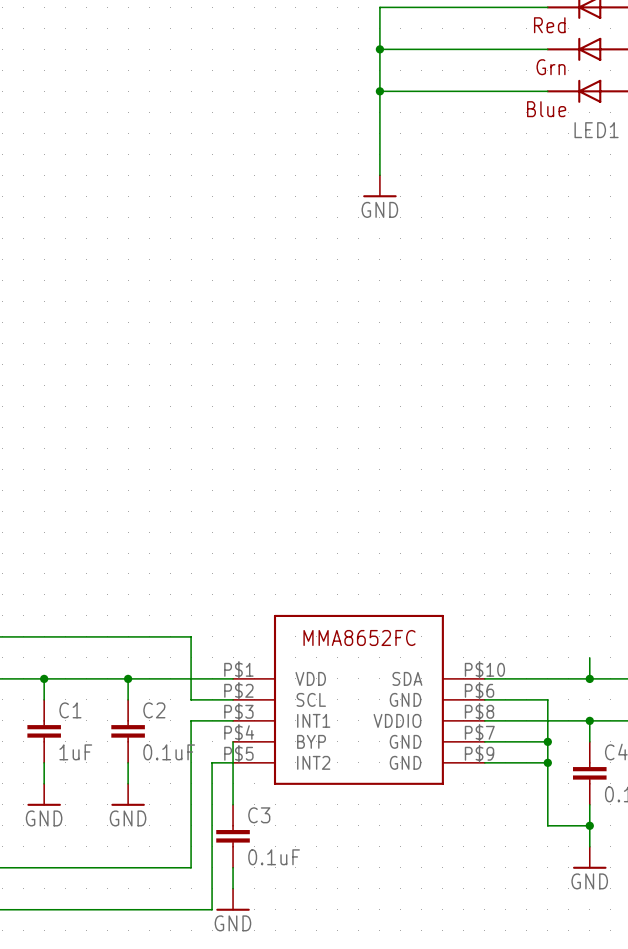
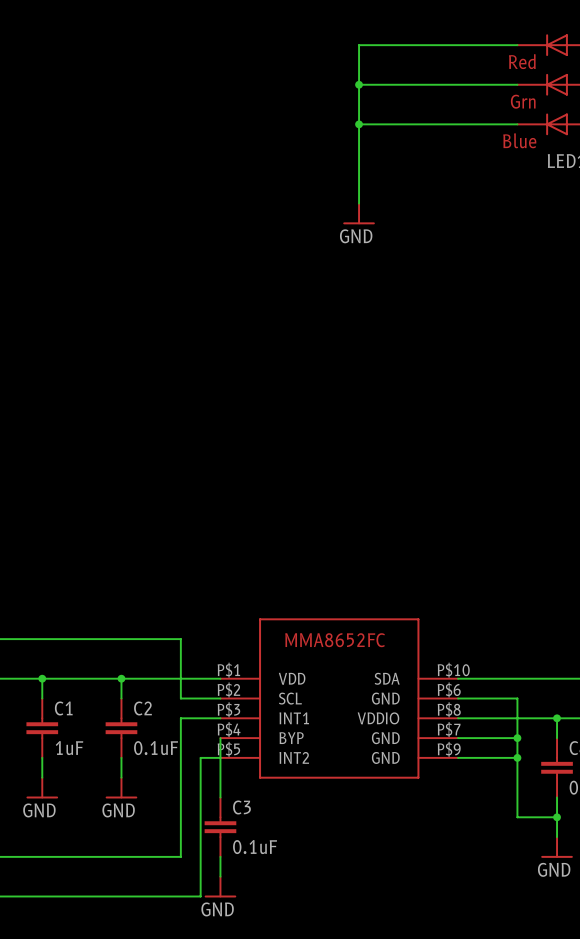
wire: (589, 657) (589, 678) -> none
junction: (589, 678) -> none

